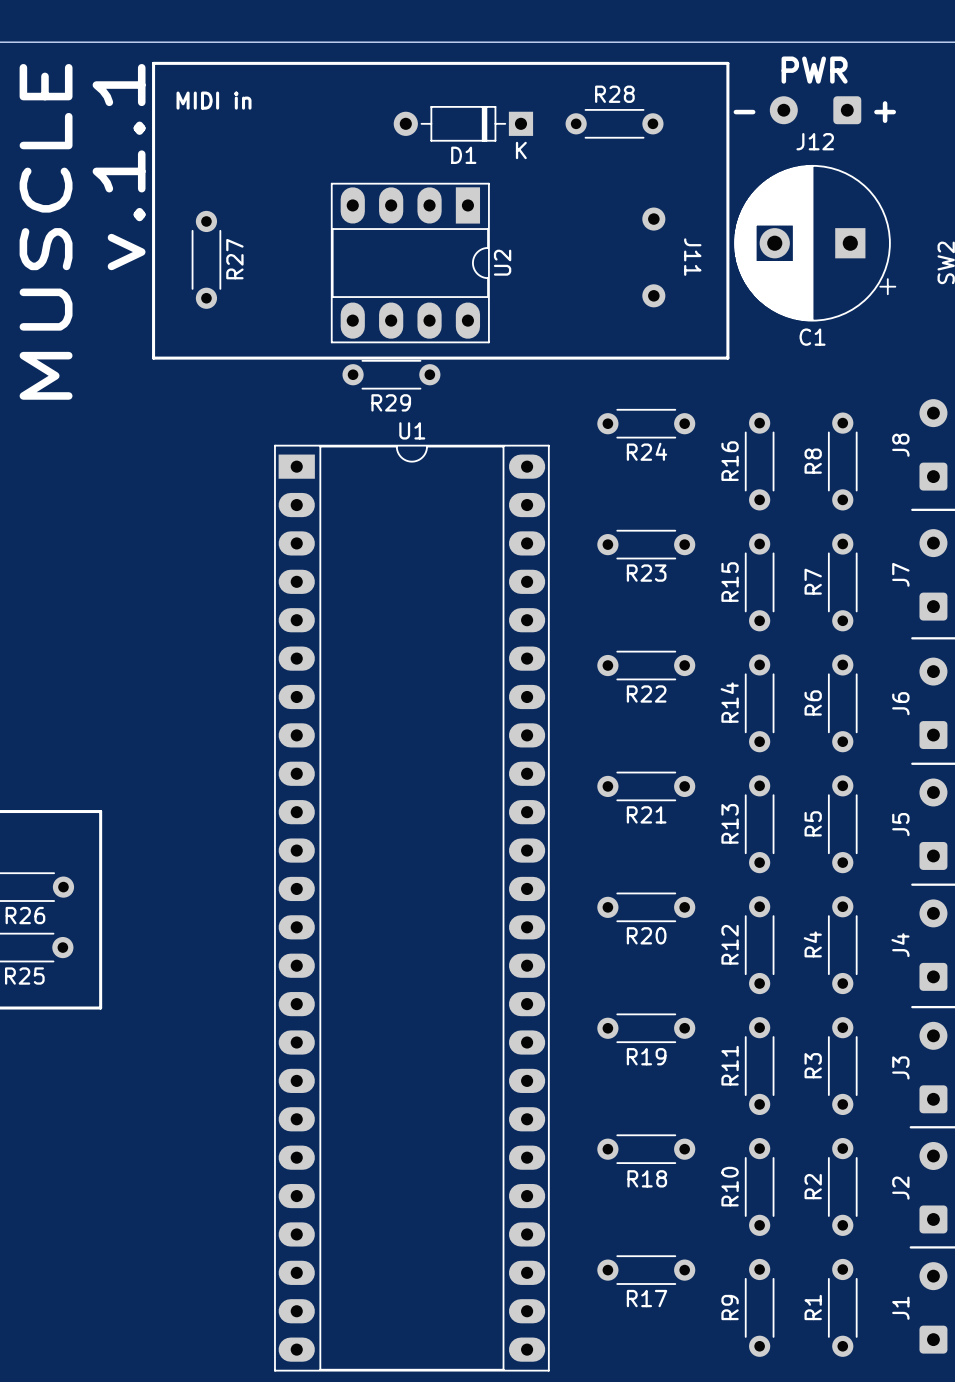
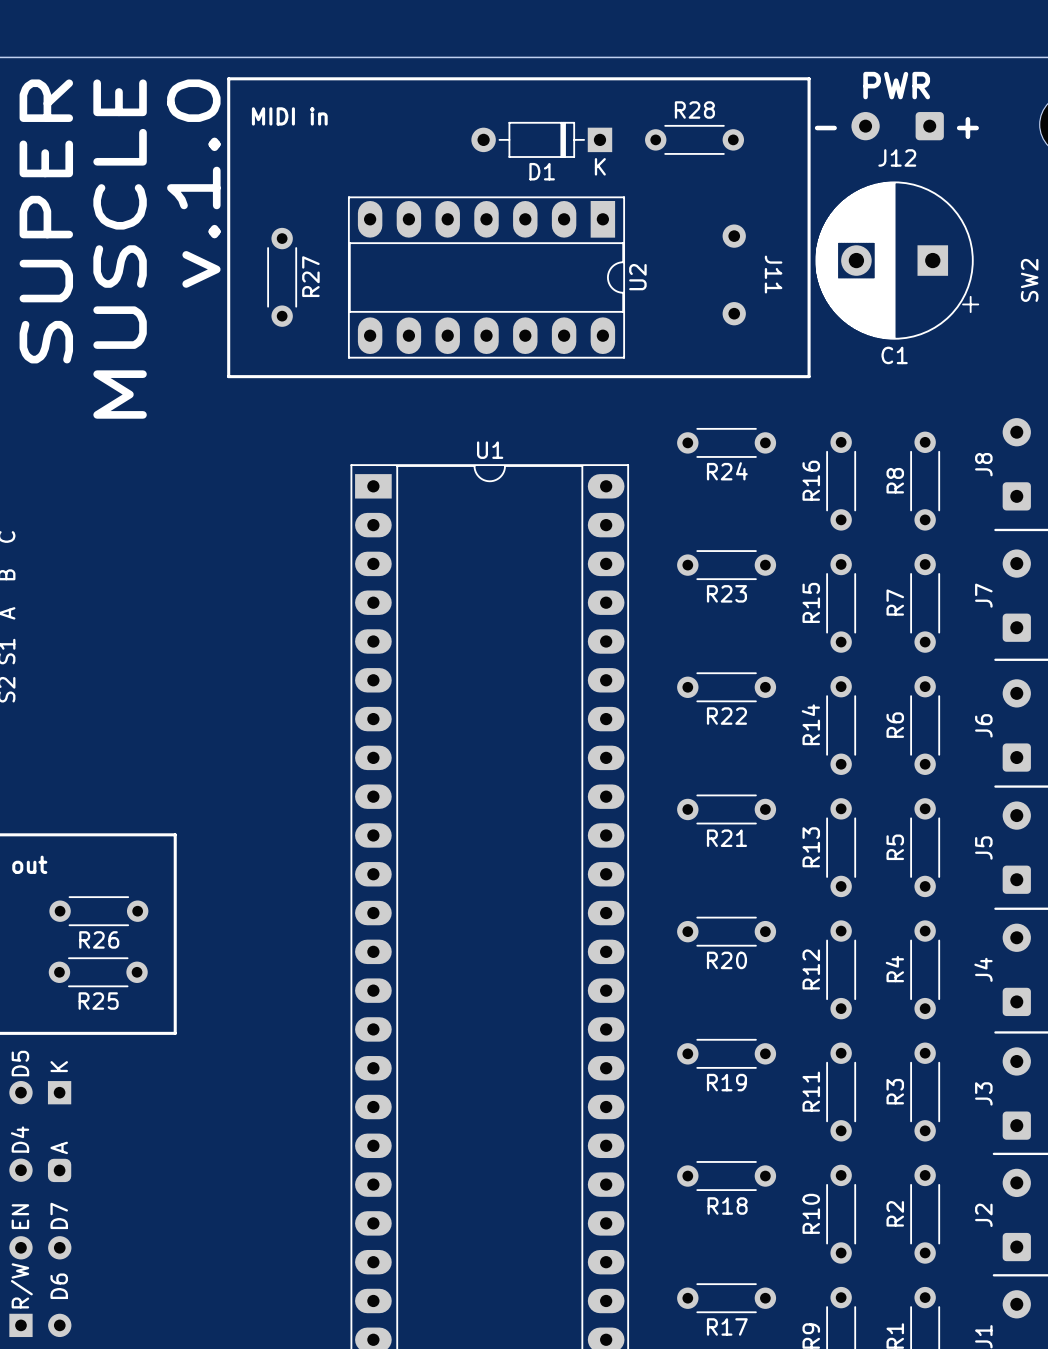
text: v.1.1 (119, 167) -> v.1.0 (193, 183)
U2 footprint: [330, 182, 490, 344] -> [347, 196, 626, 359]
U2 name position: U2 (502, 262) -> U2 (637, 277)
R29: (391, 374) -> none

